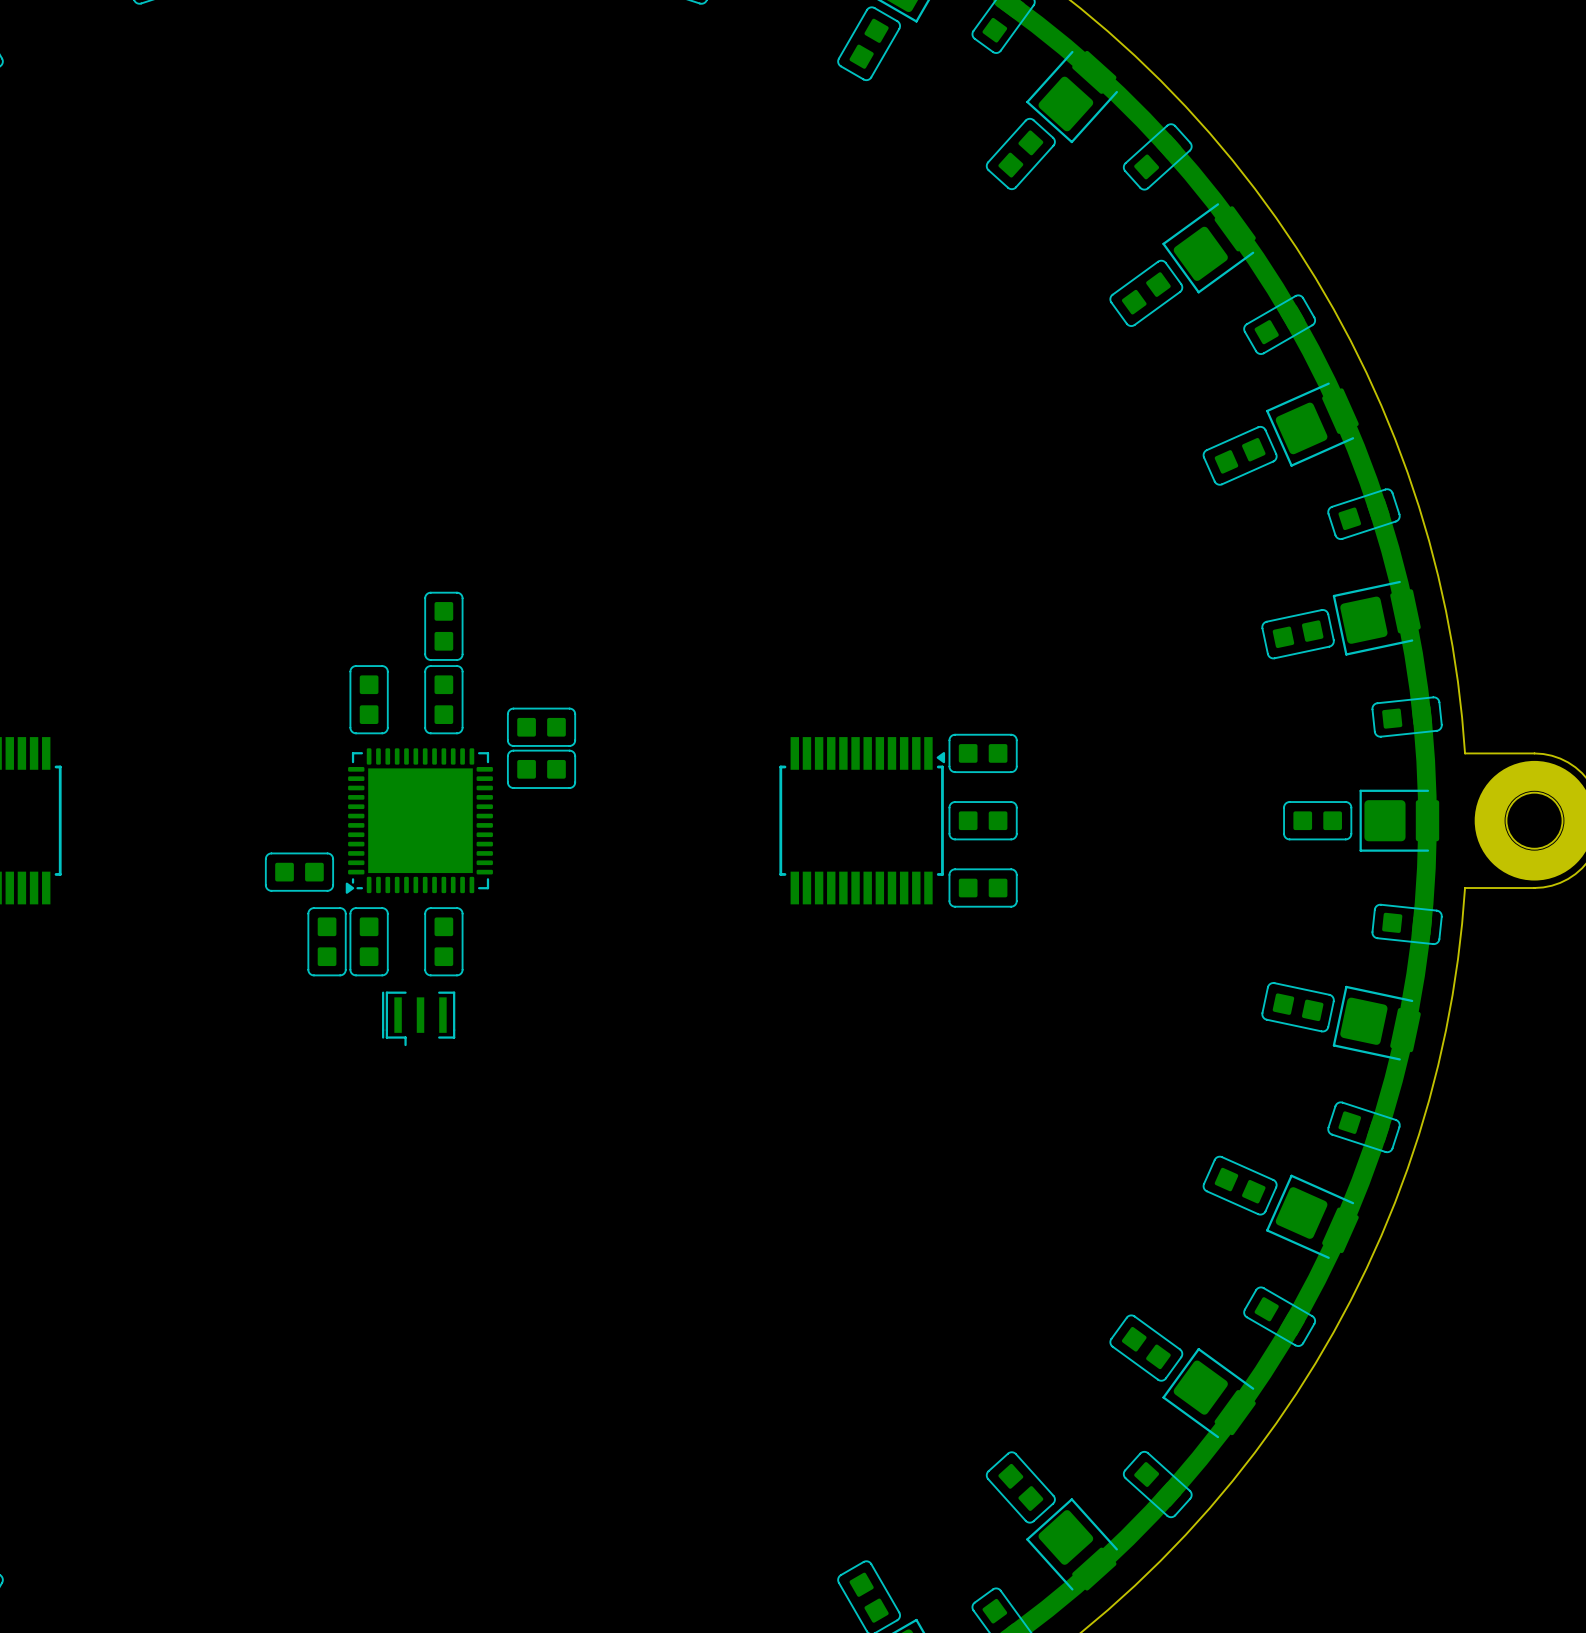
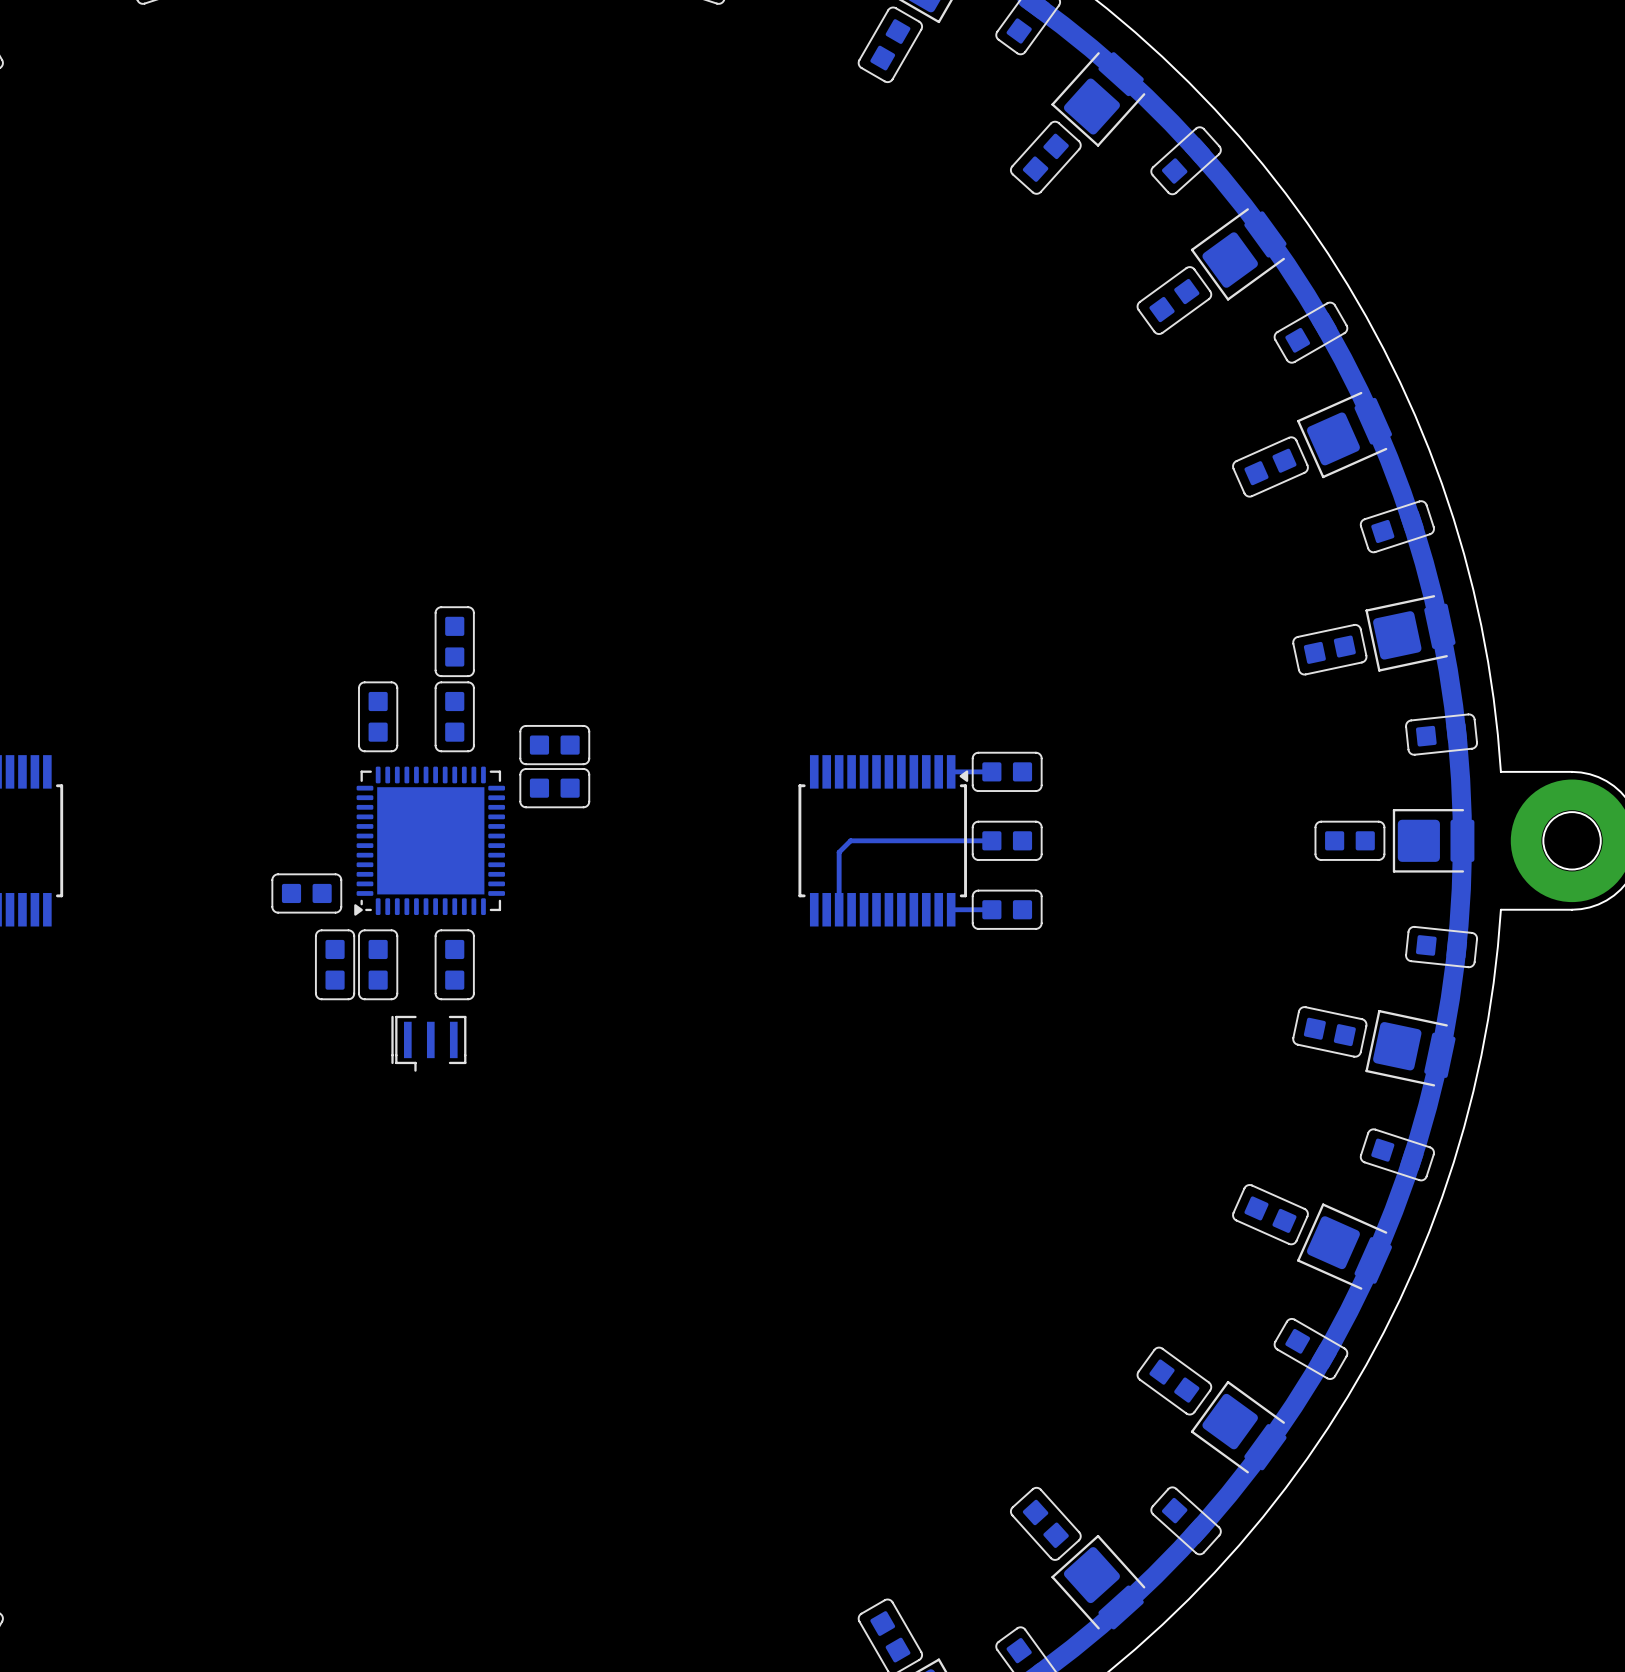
track: none -> (991, 771) (951, 771)
track: none -> (991, 840) (850, 840) (839, 852) (839, 909)
track: none -> (991, 909) (951, 909)

